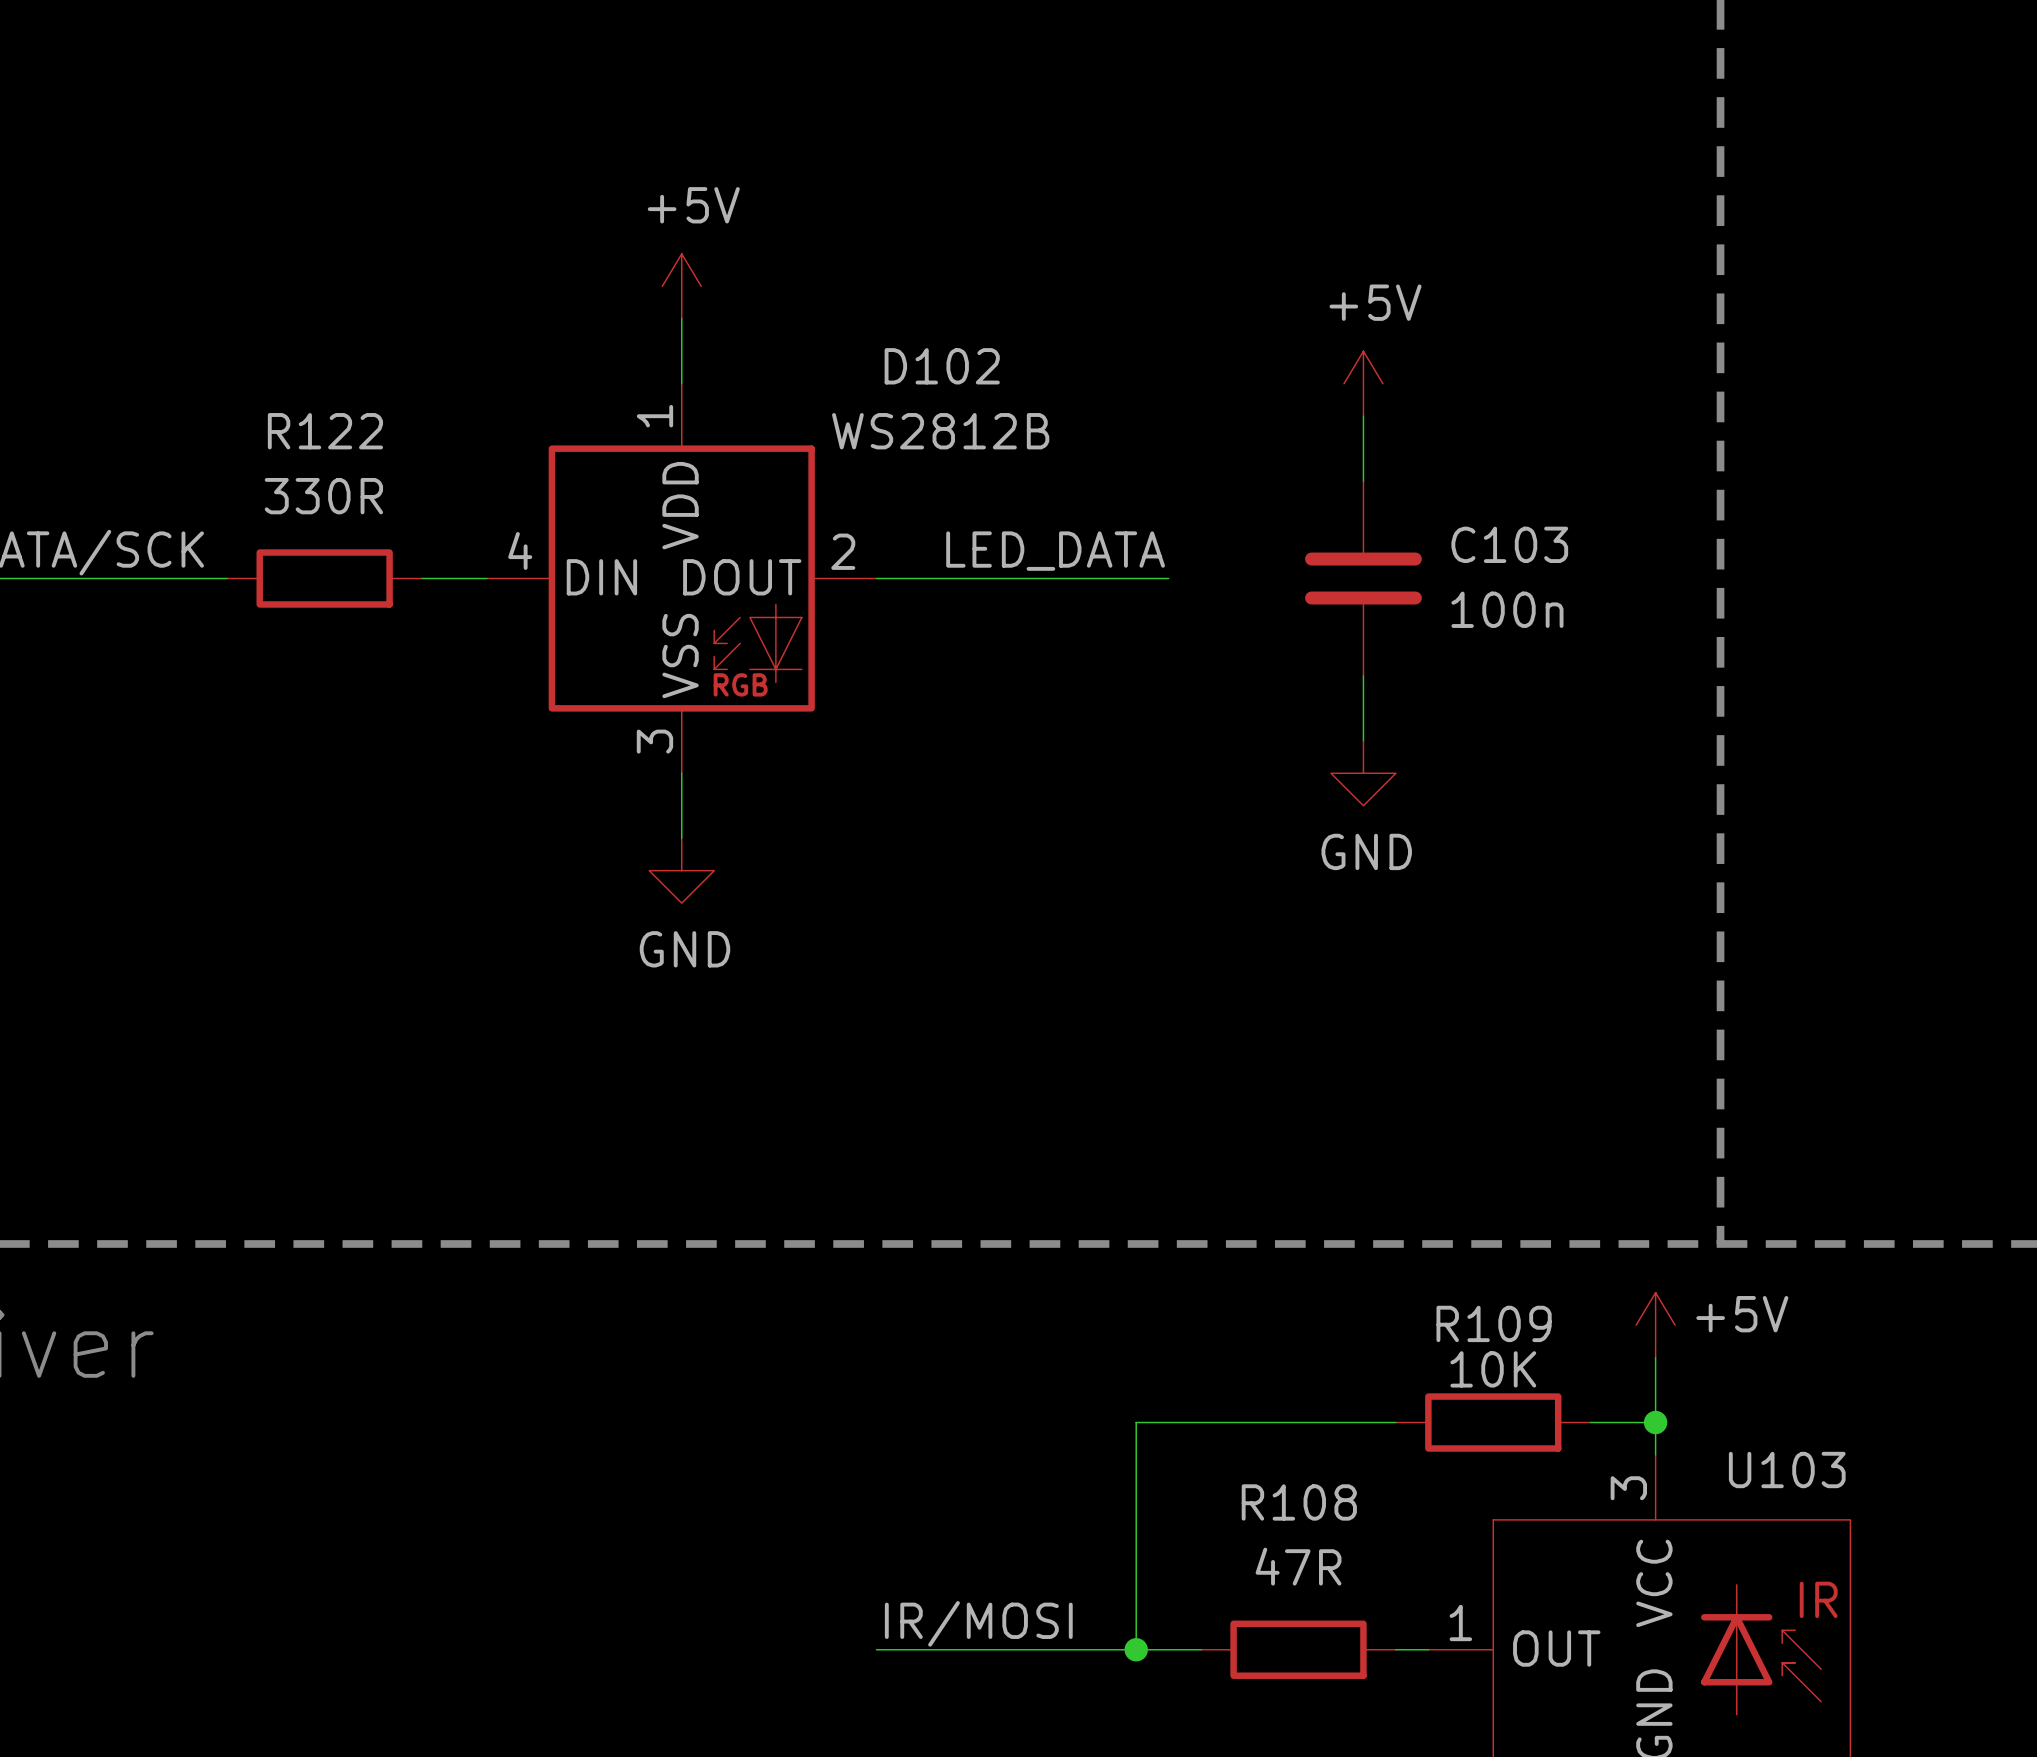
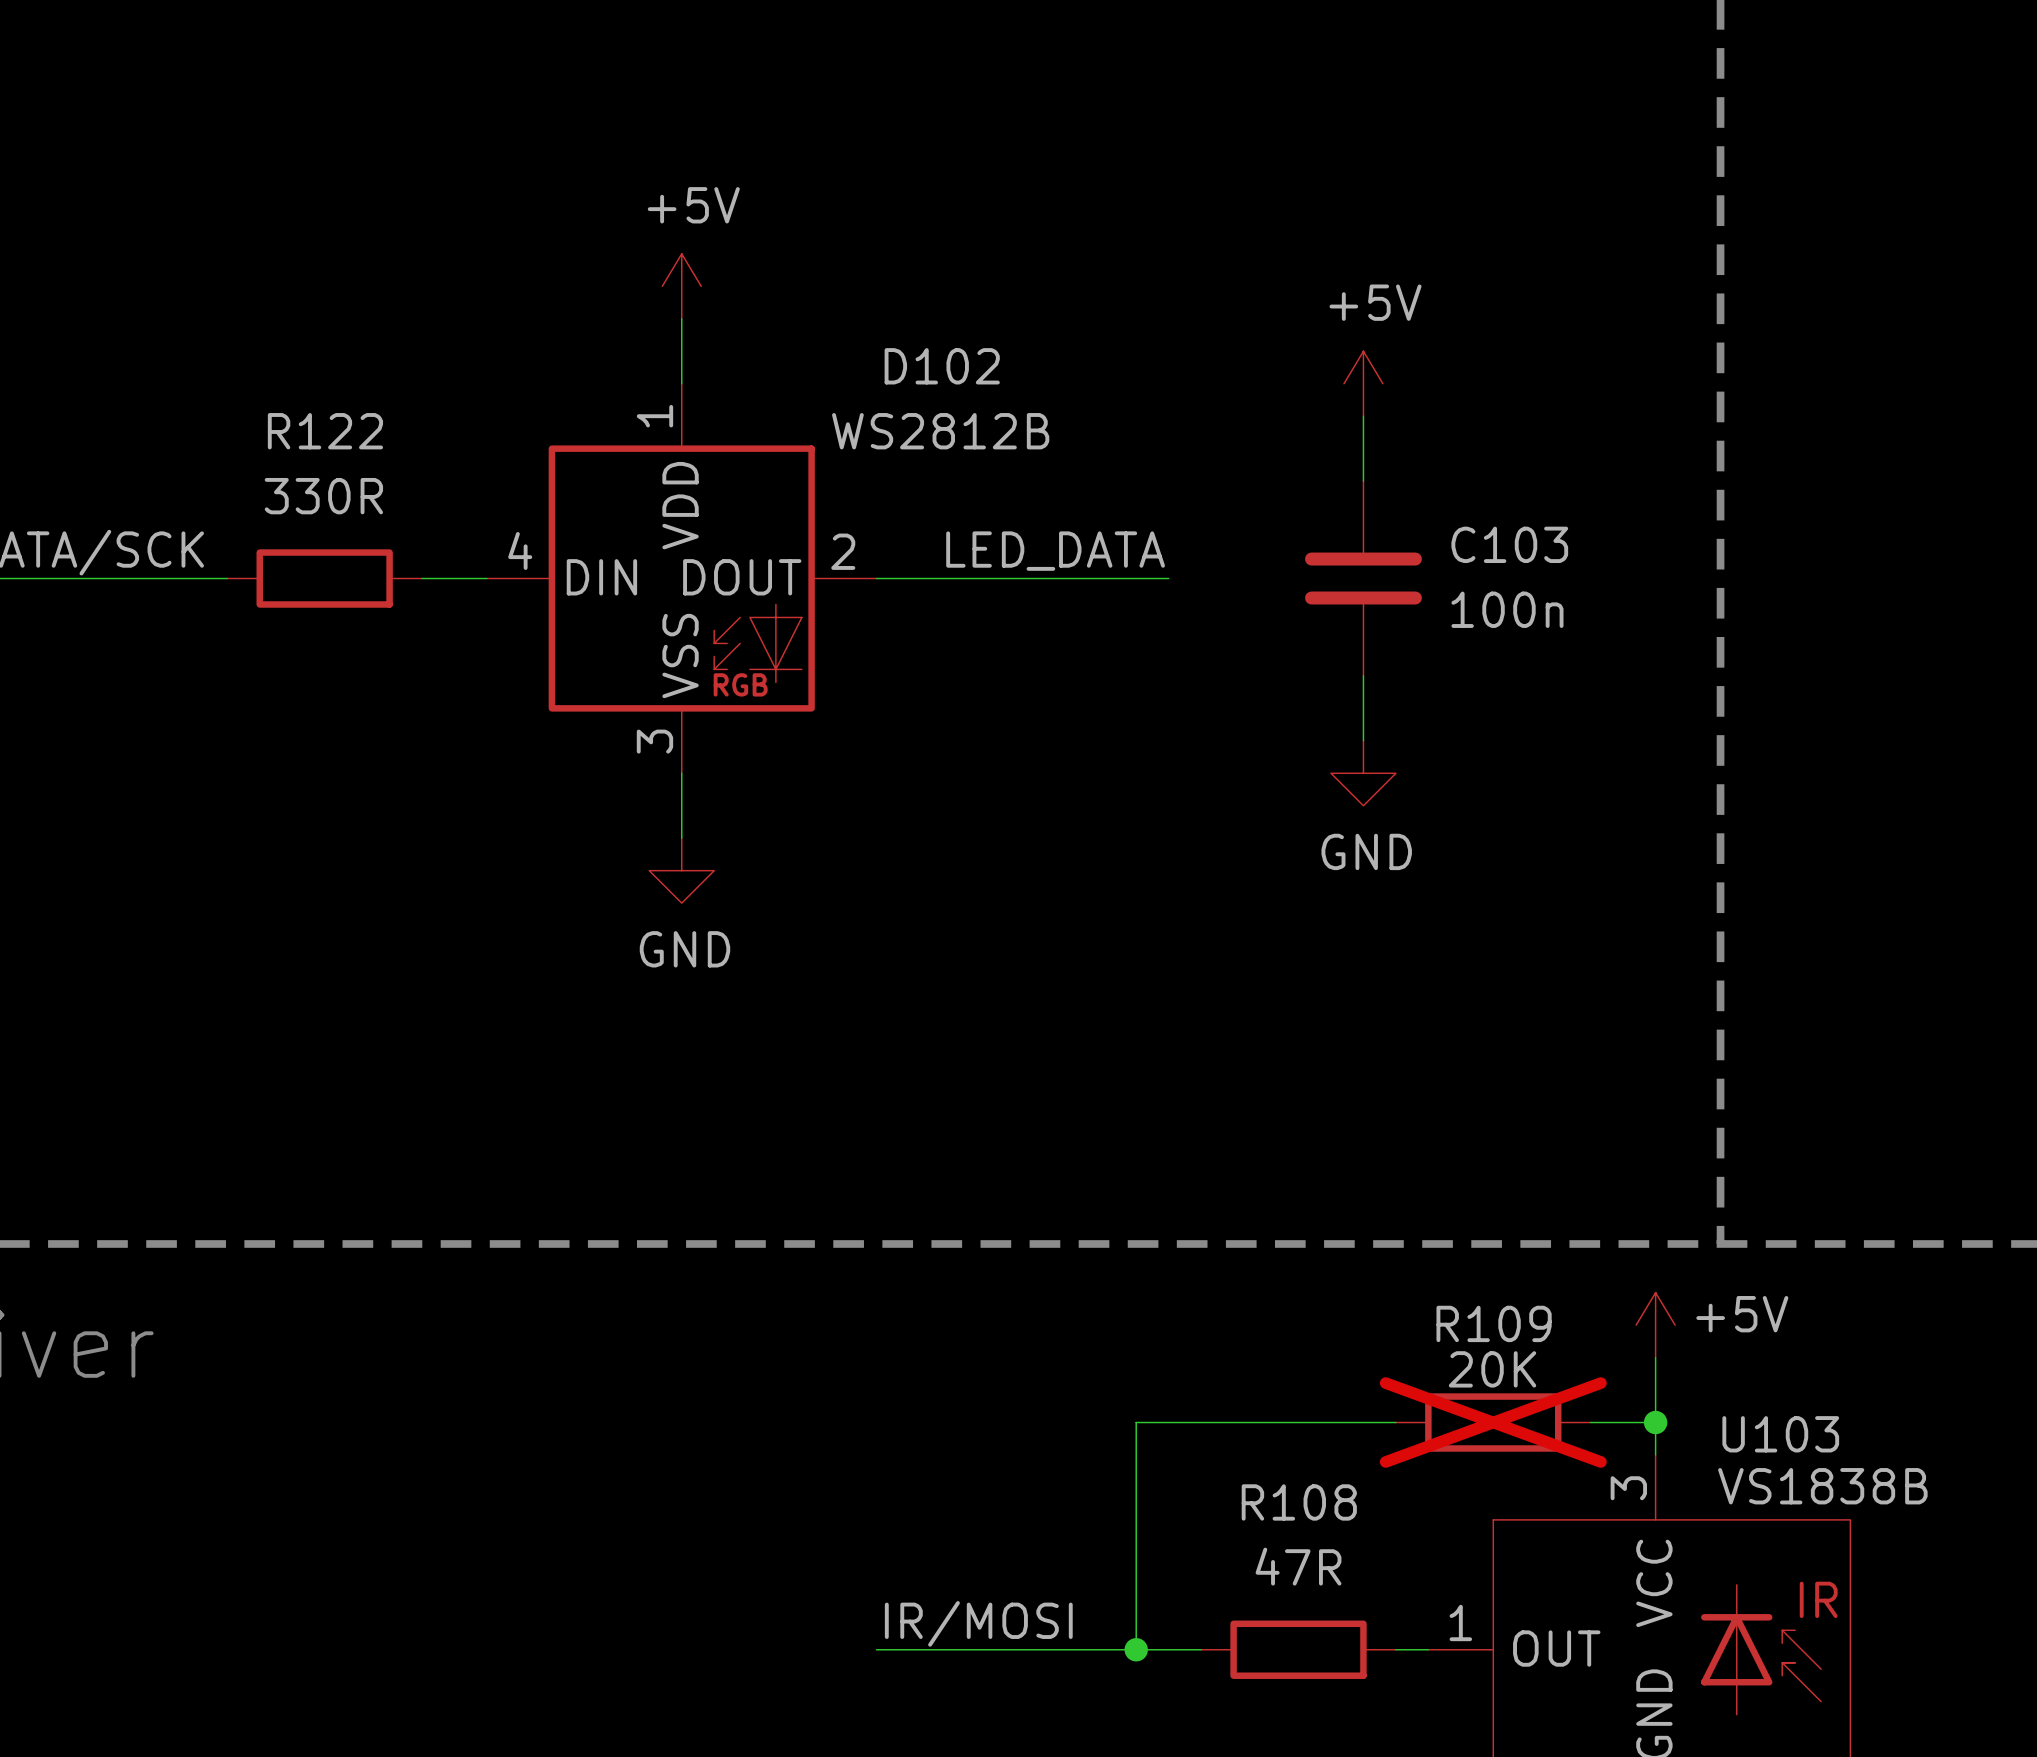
R109 value: 10K (1493, 1369) -> 20K (1492, 1369)
R109 do-not-place cross: none -> (1493, 1422)
U103 name position: U103 (1787, 1470) -> U103 (1780, 1434)
U103 value: none -> VS1838B (1822, 1486)

